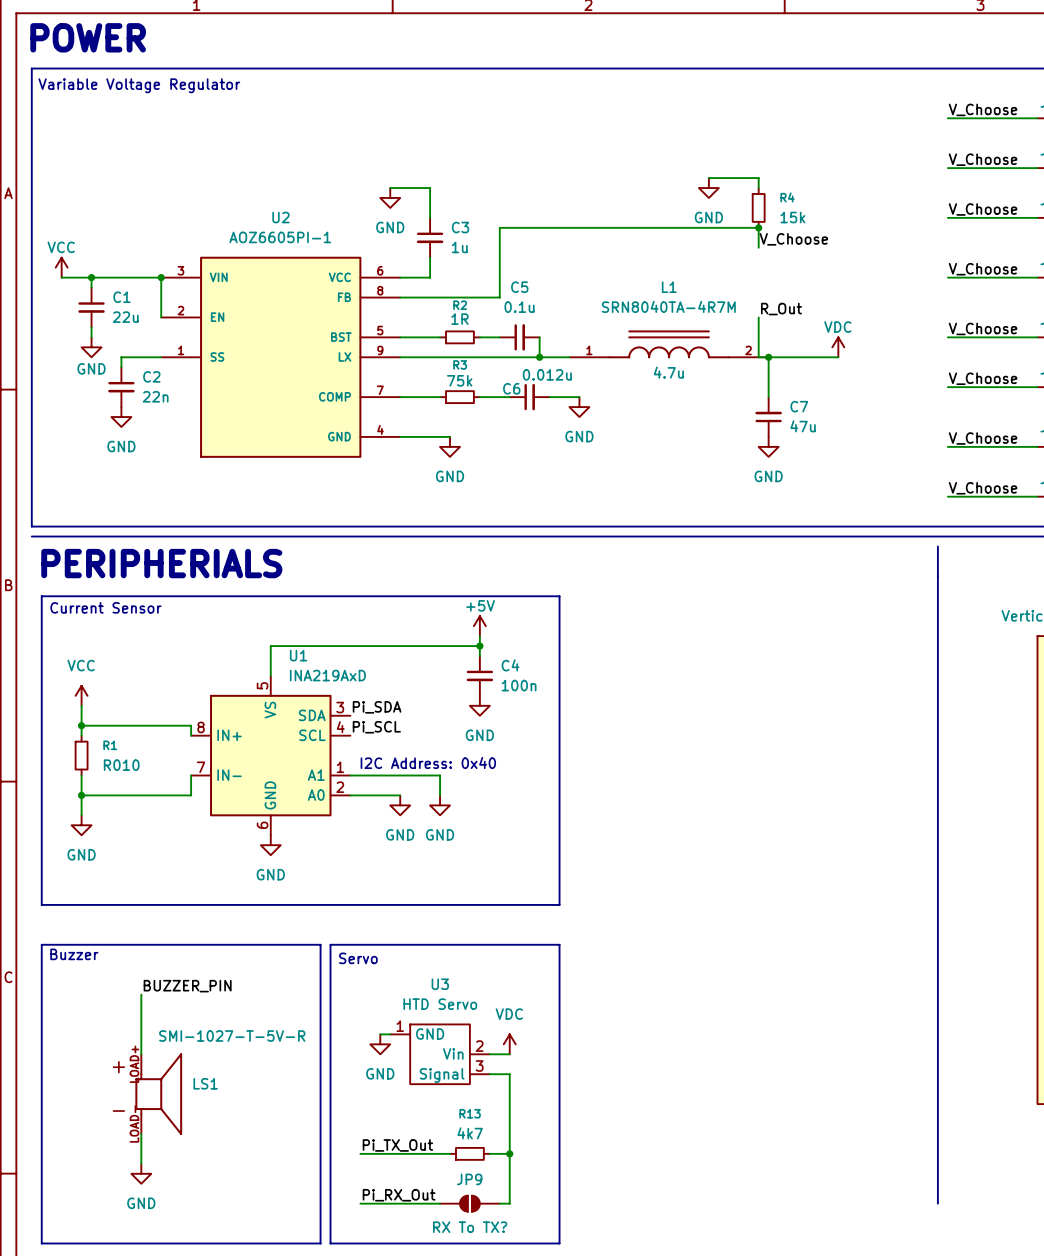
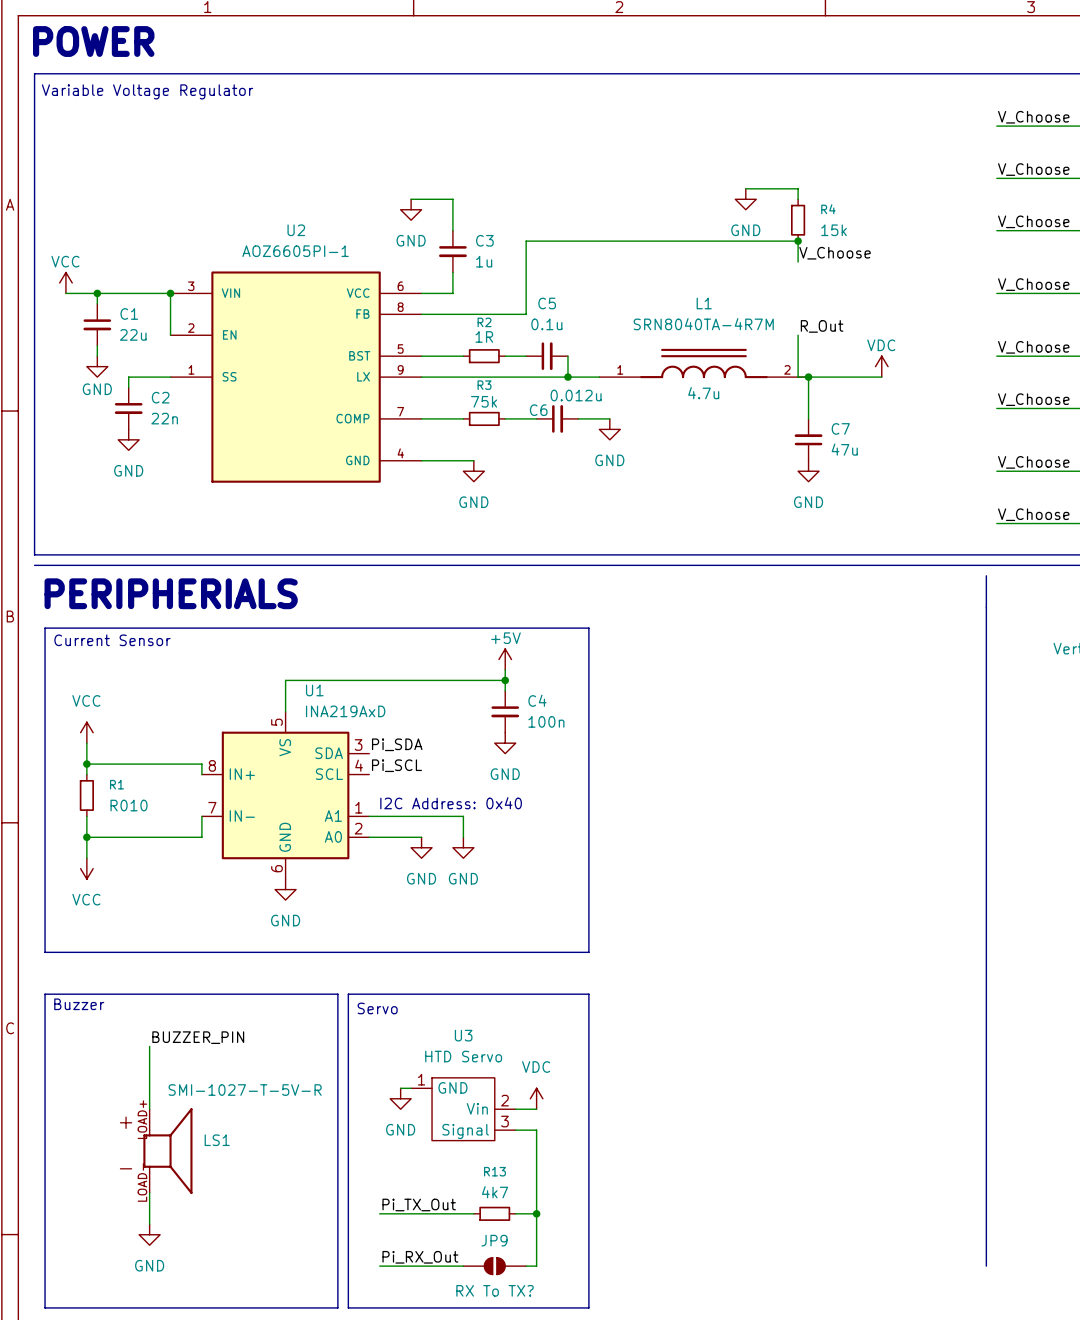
power symbol: GND (81, 825) -> VCC (86, 868)

